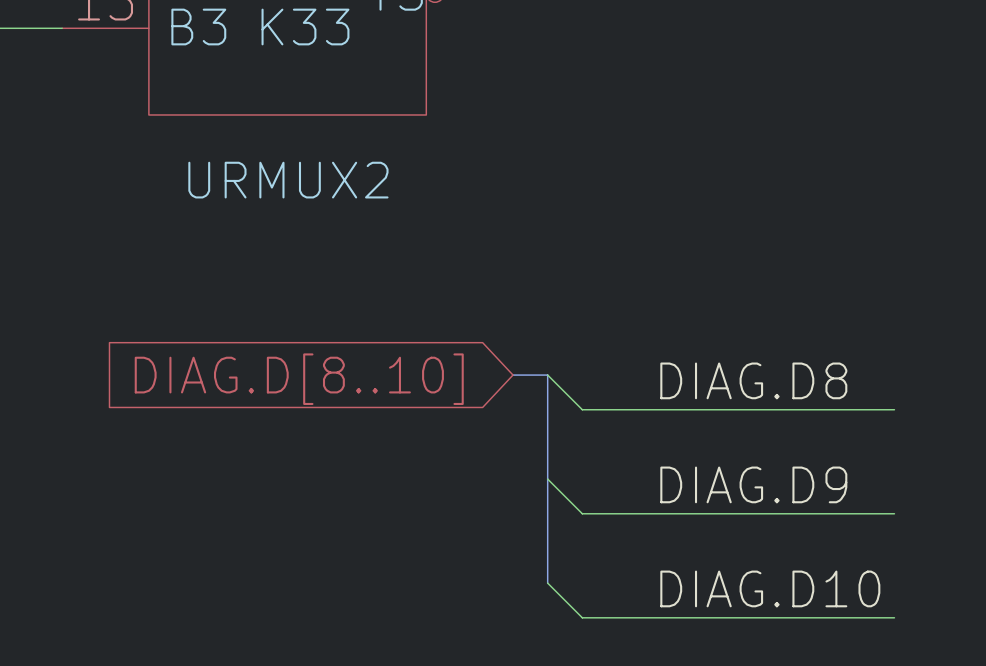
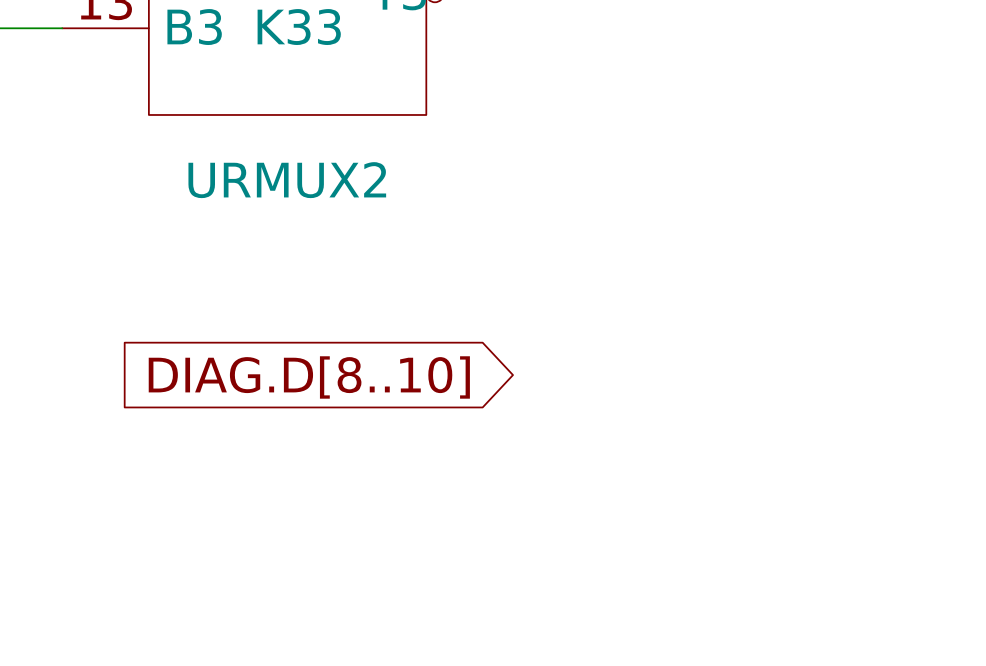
bus: (513, 375) (547, 375) (547, 583) -> none
wire: (547, 375) (582, 409) (894, 409) -> none
label: DIAG.D8 (753, 380) -> none
wire: (547, 479) (582, 513) (894, 513) -> none
label: DIAG.D9 (753, 484) -> none
wire: (547, 583) (582, 617) (894, 617) -> none
label: DIAG.D10 (770, 588) -> none

